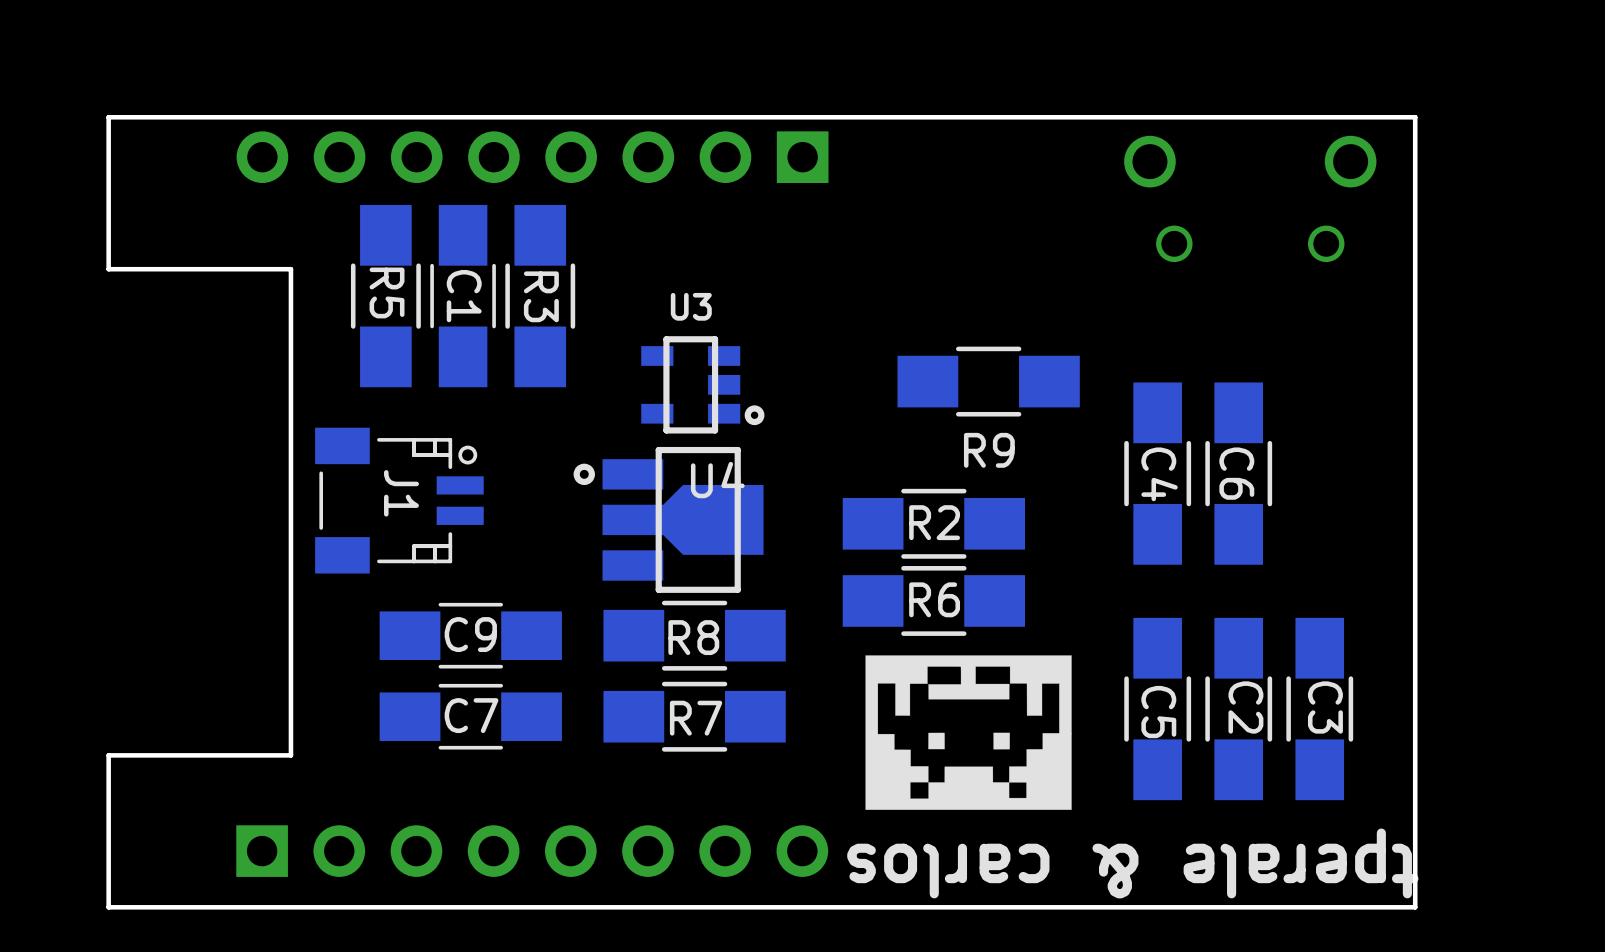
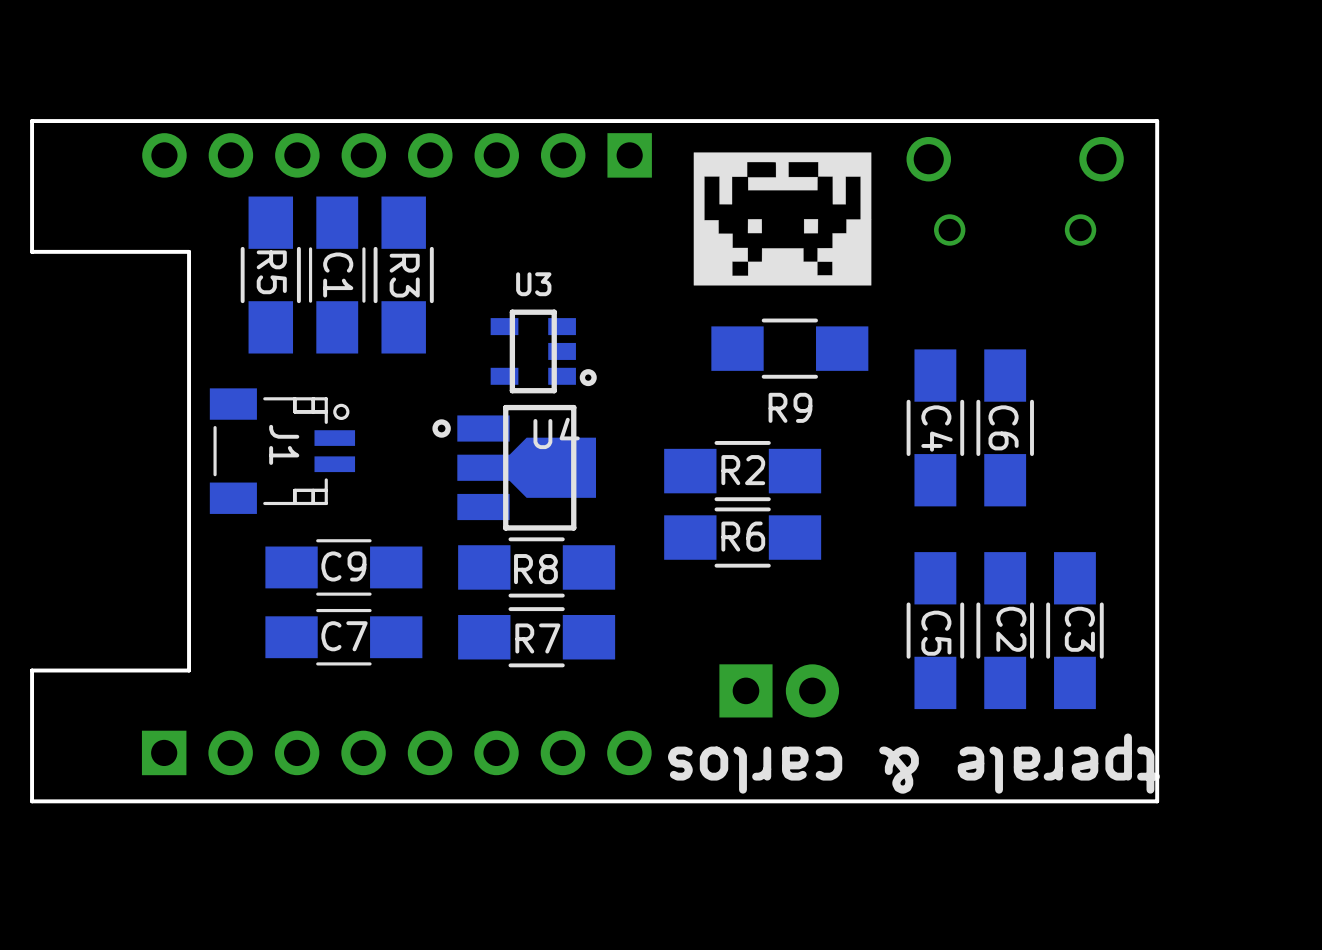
drawing position: (968, 732) -> (782, 218)
part: none -> (779, 690)

